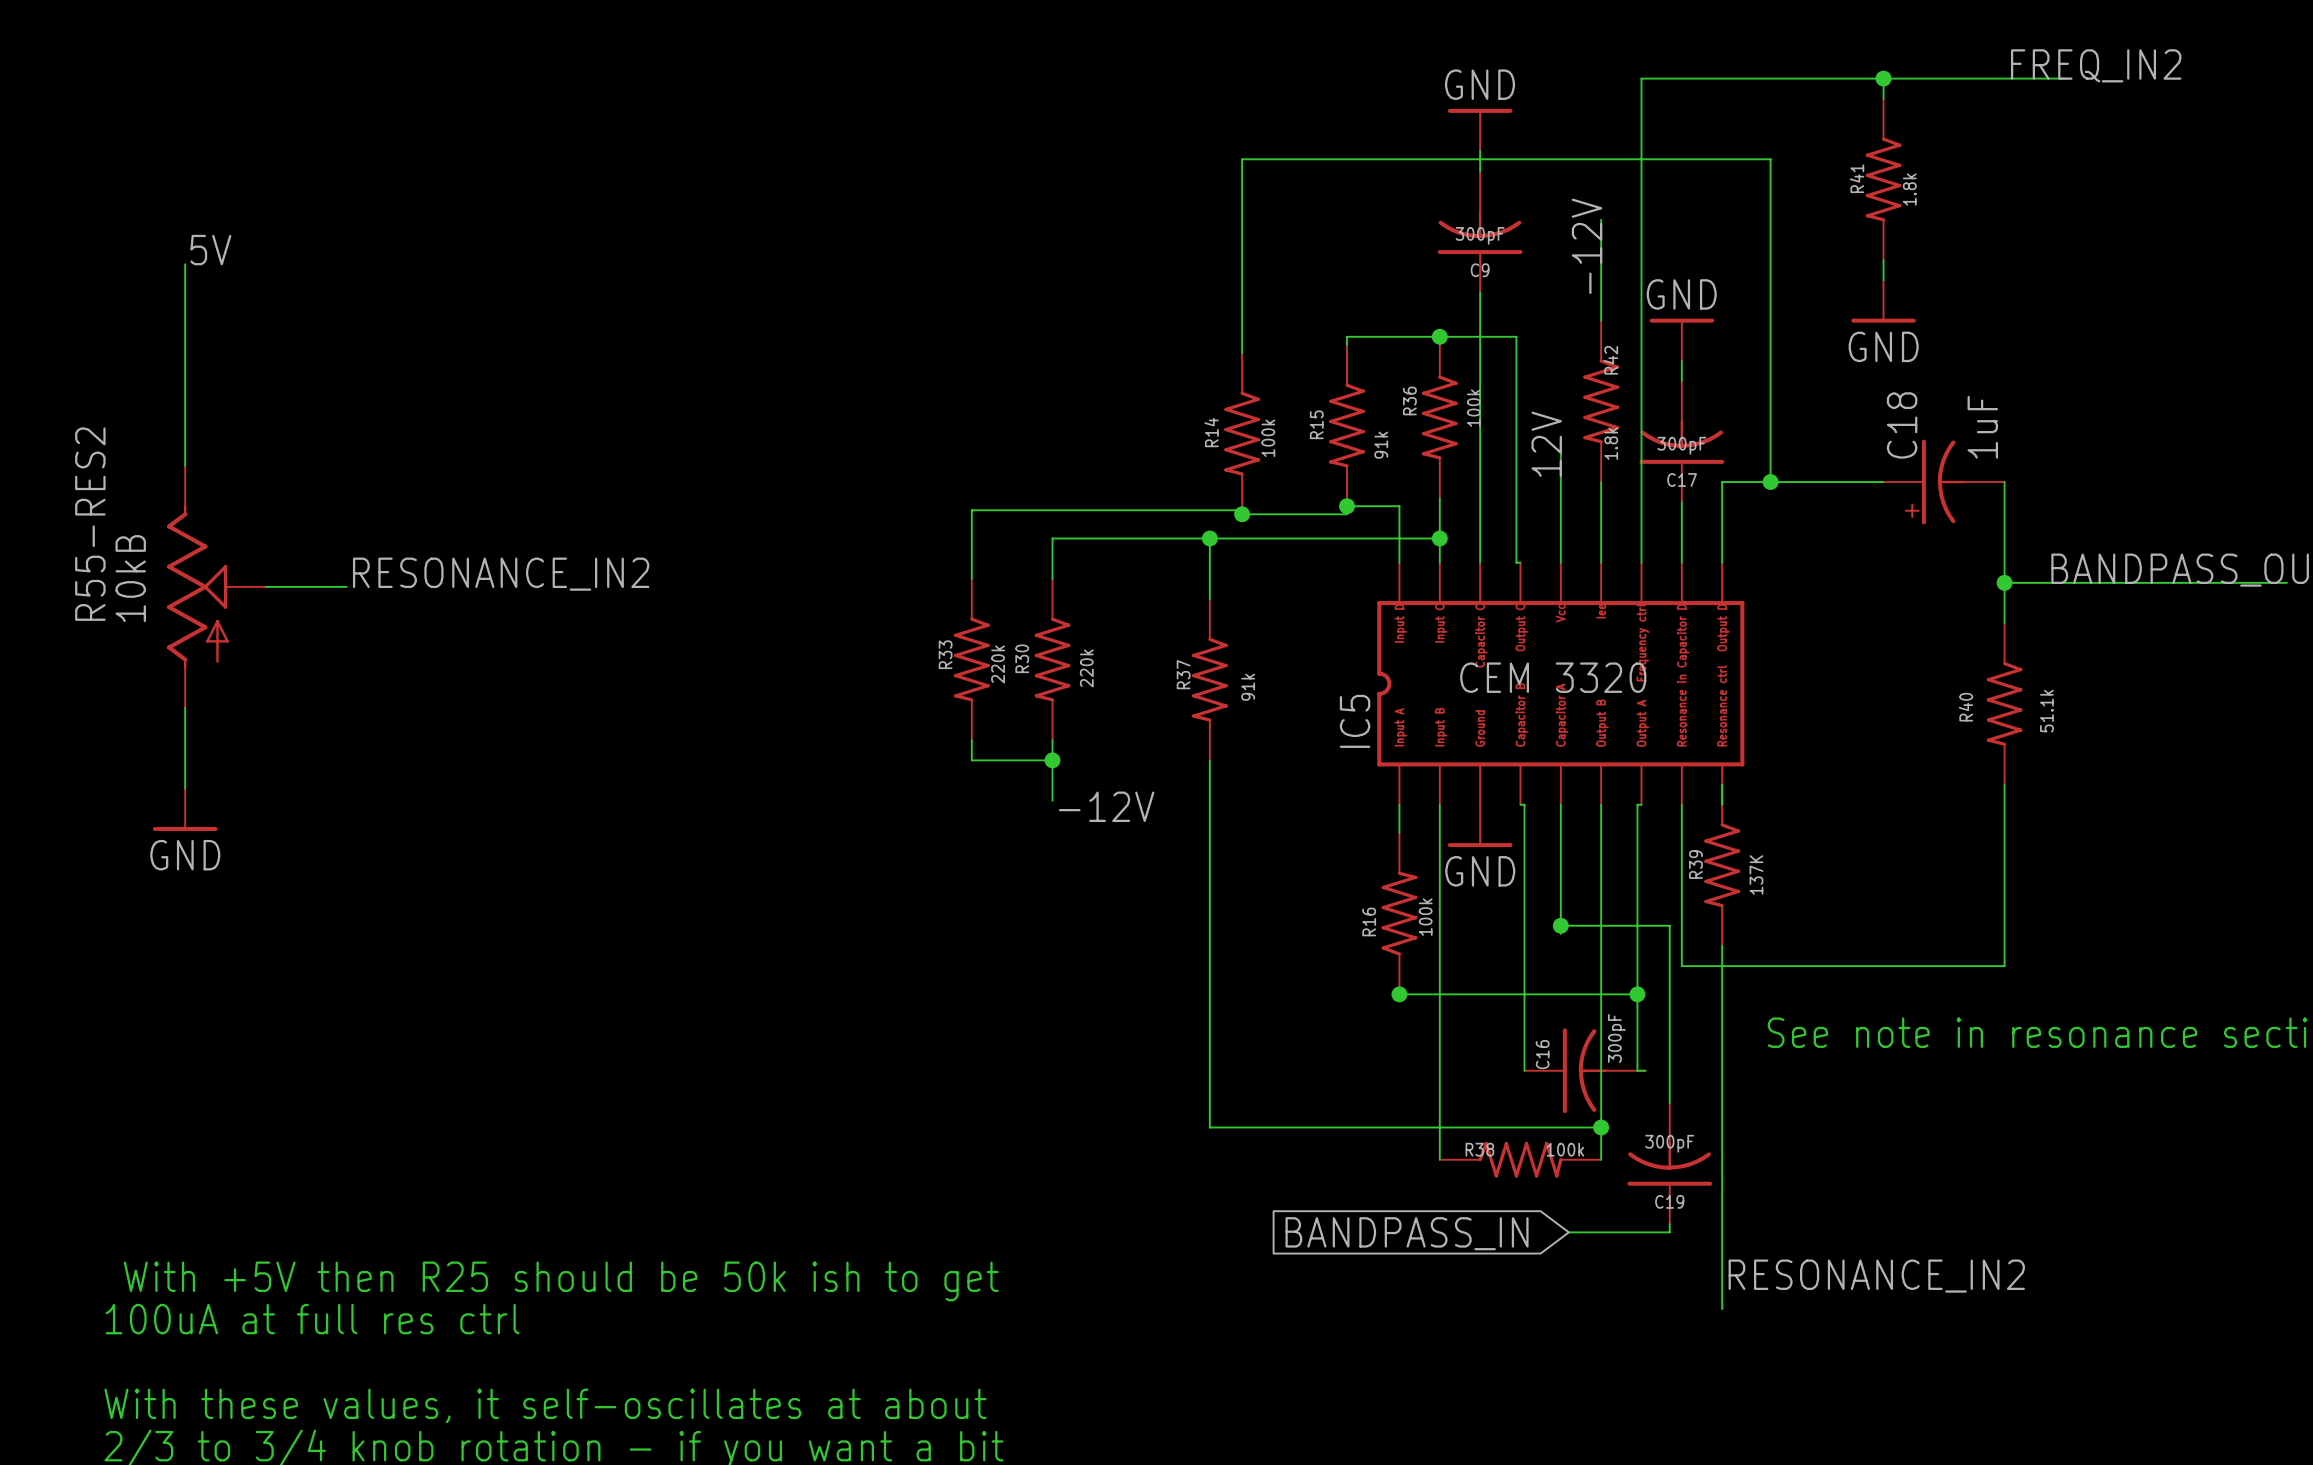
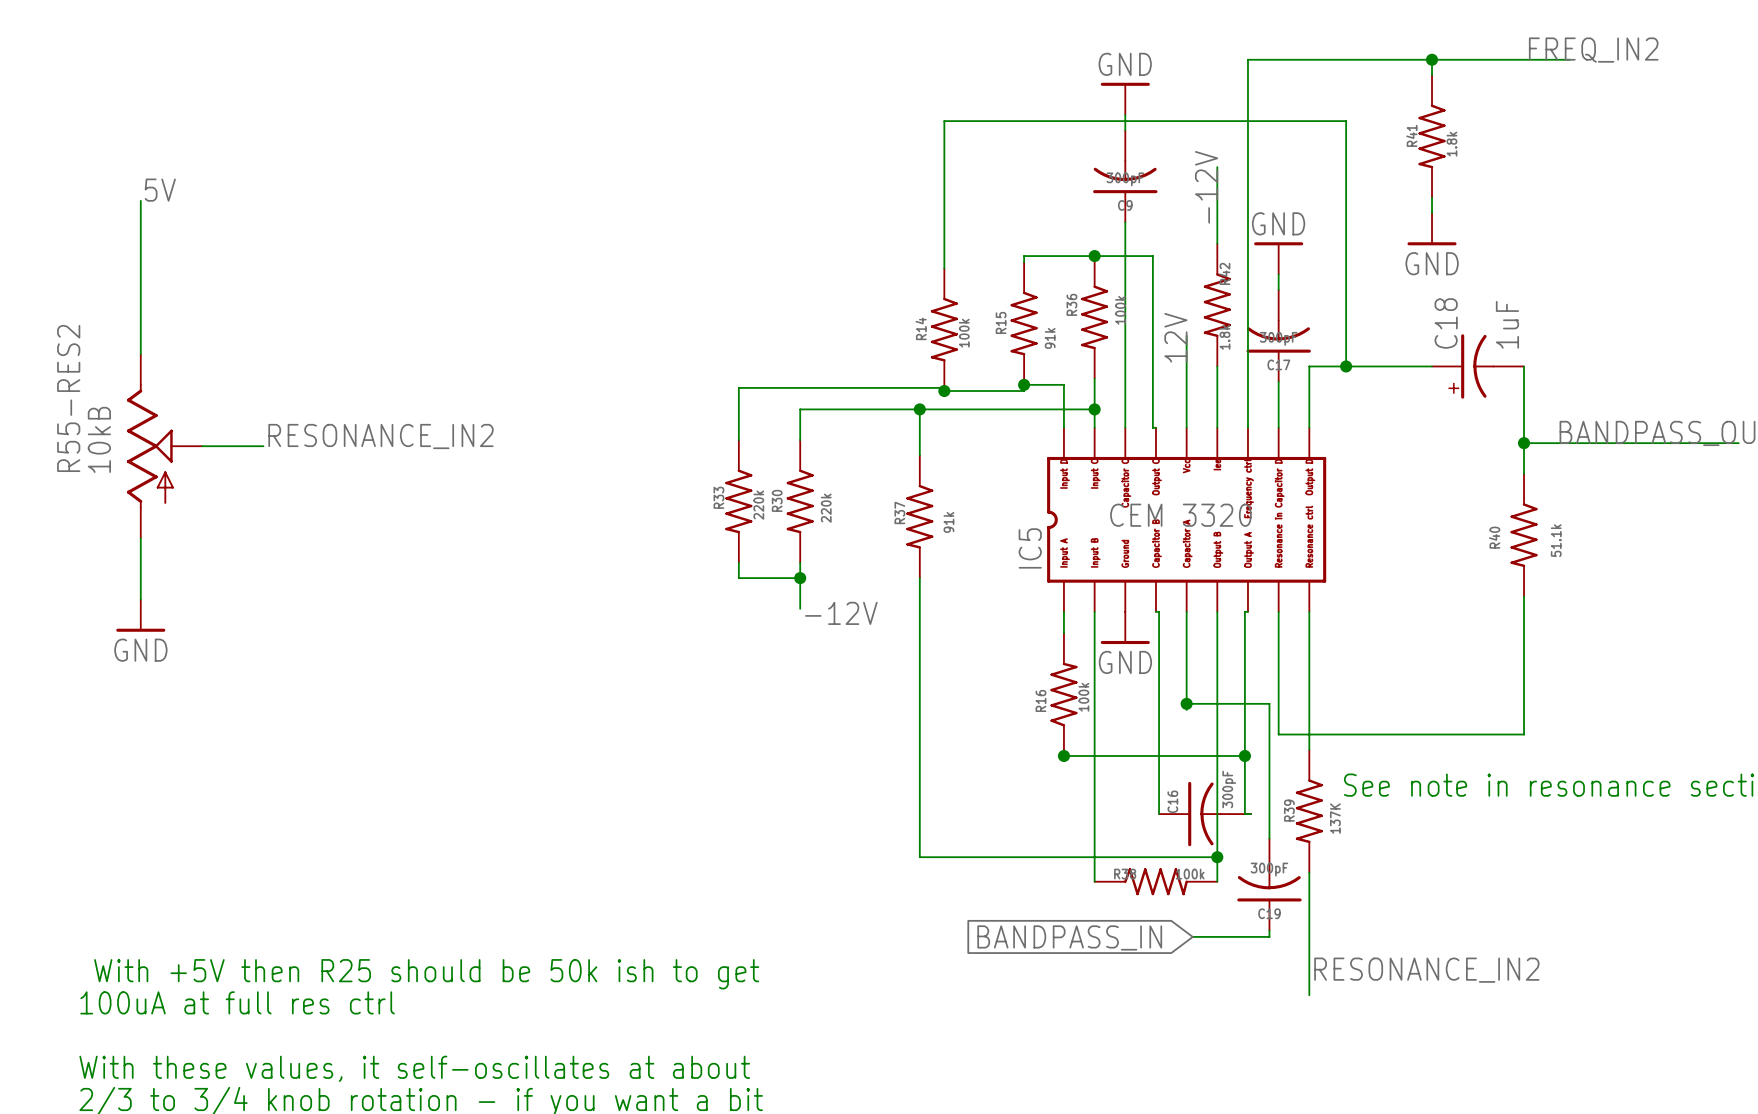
R39 position: (1722, 865) -> (1309, 811)

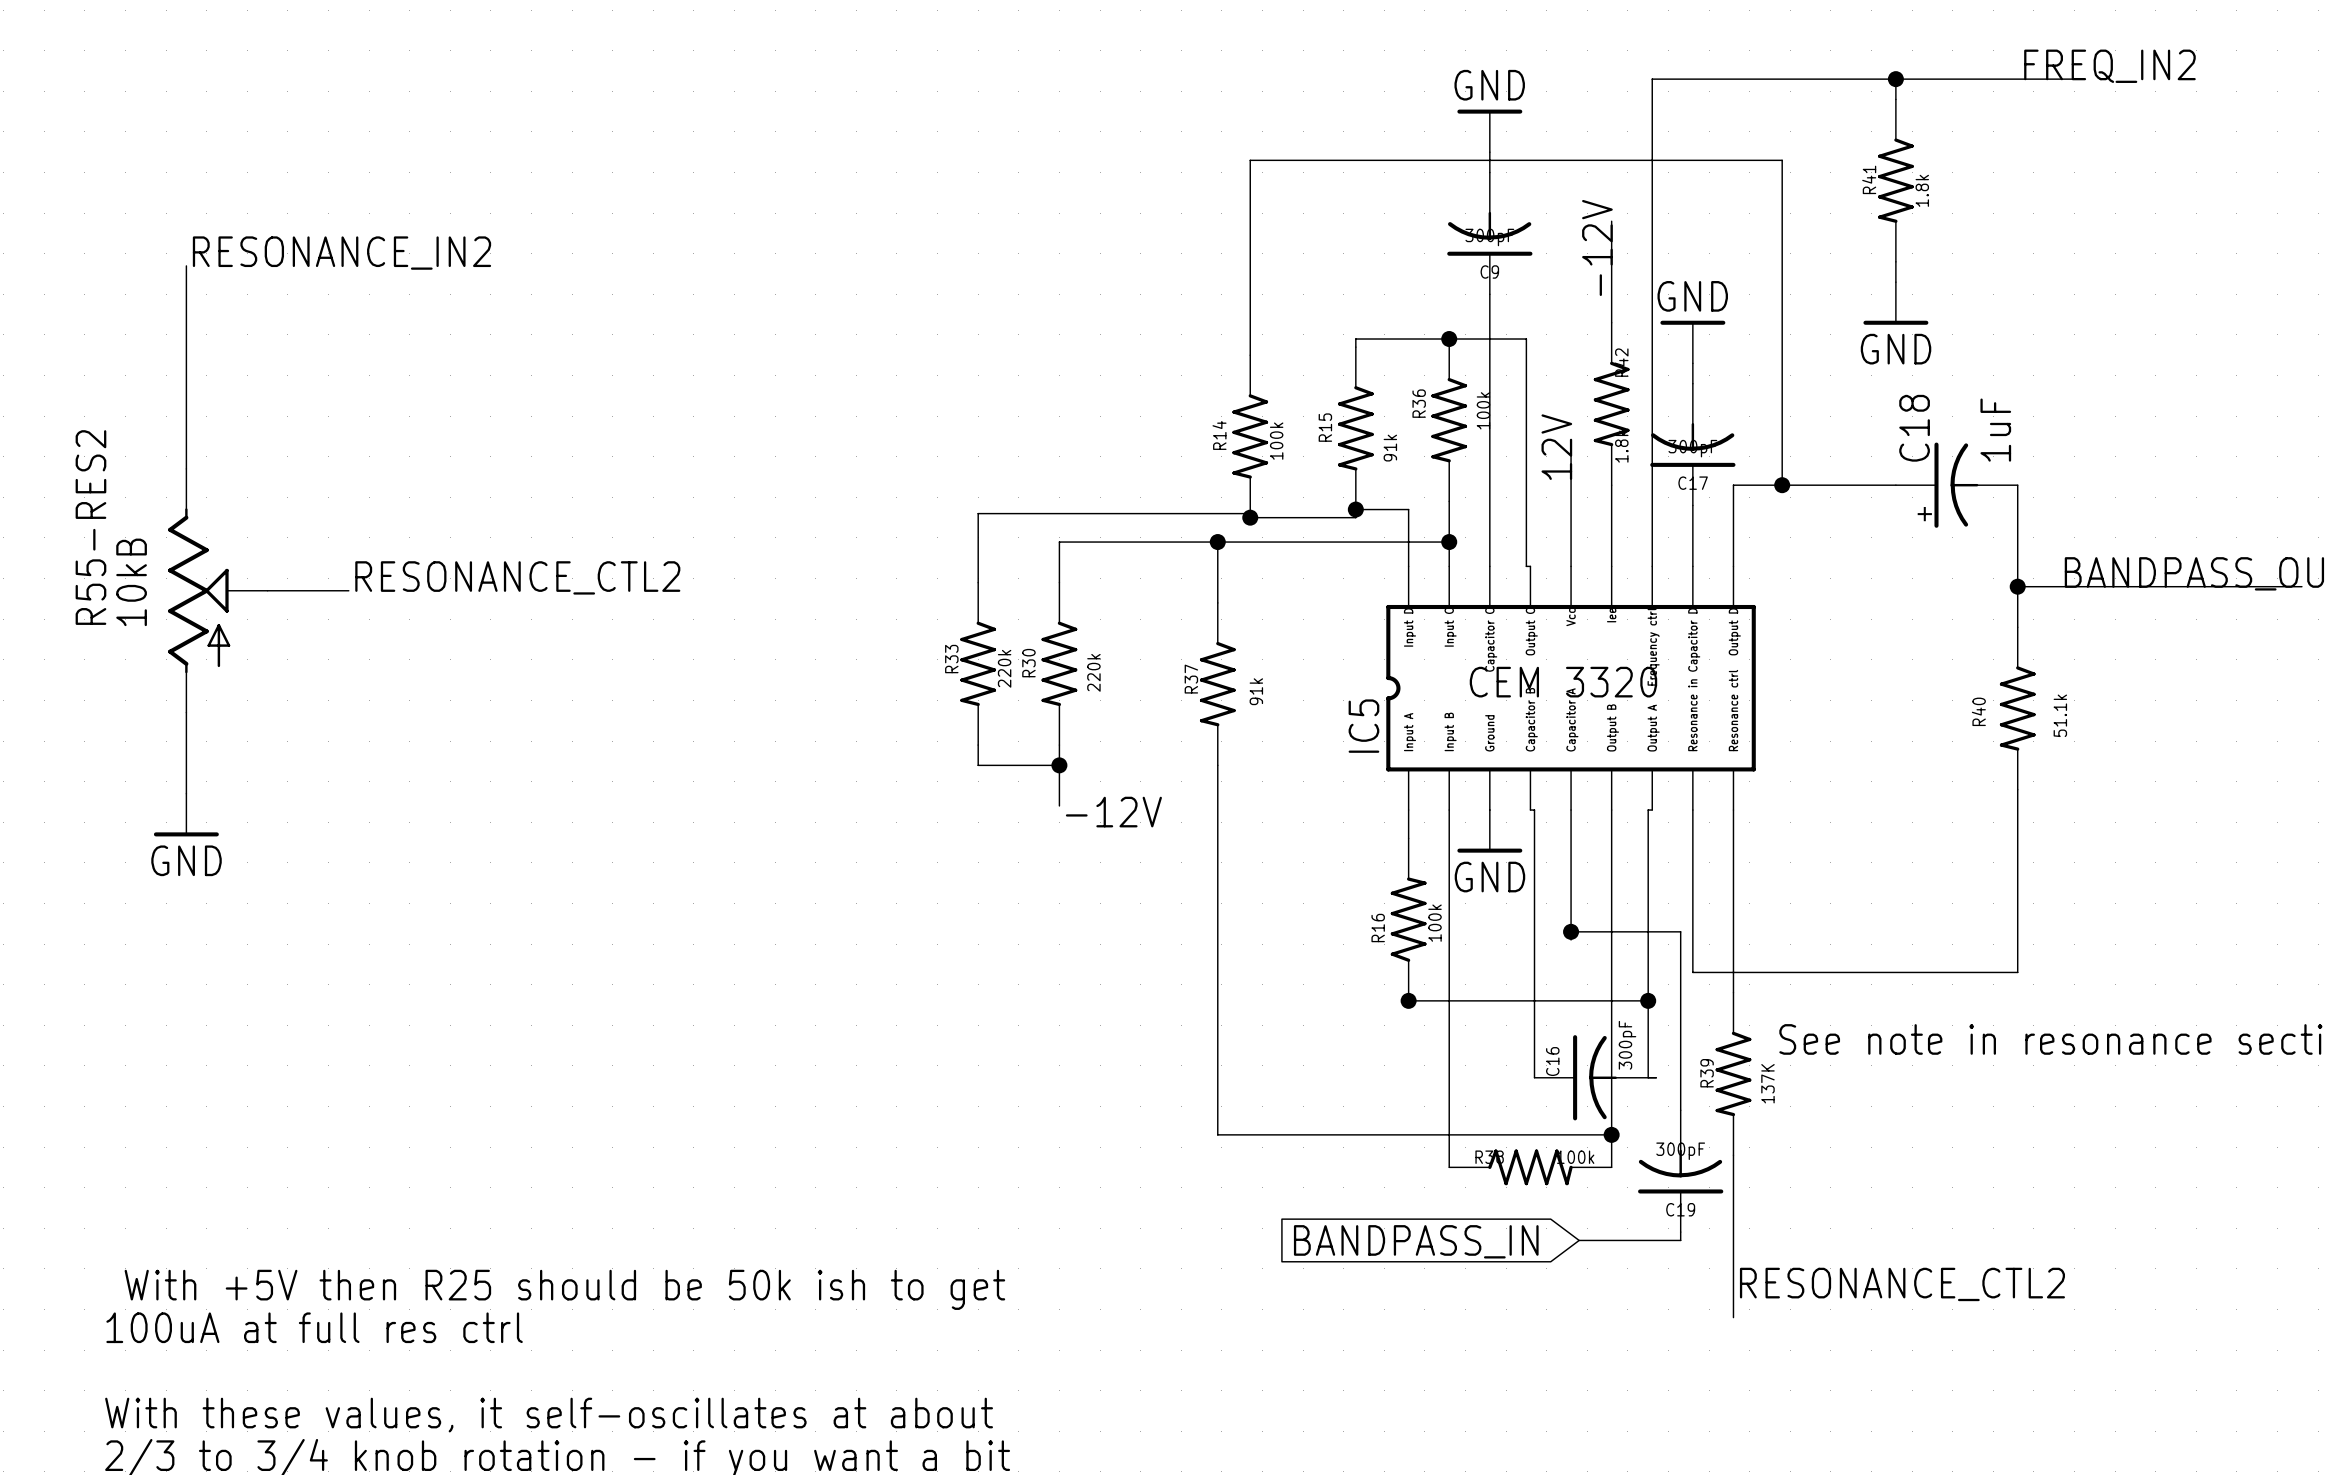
label: 5V (160, 190) -> RESONANCE_IN2 (341, 253)
label: RESONANCE_IN2 (380, 436) -> RESONANCE_CTL2 (517, 577)
label: RESONANCE_IN2 (1426, 970) -> RESONANCE_CTL2 (1902, 1284)

